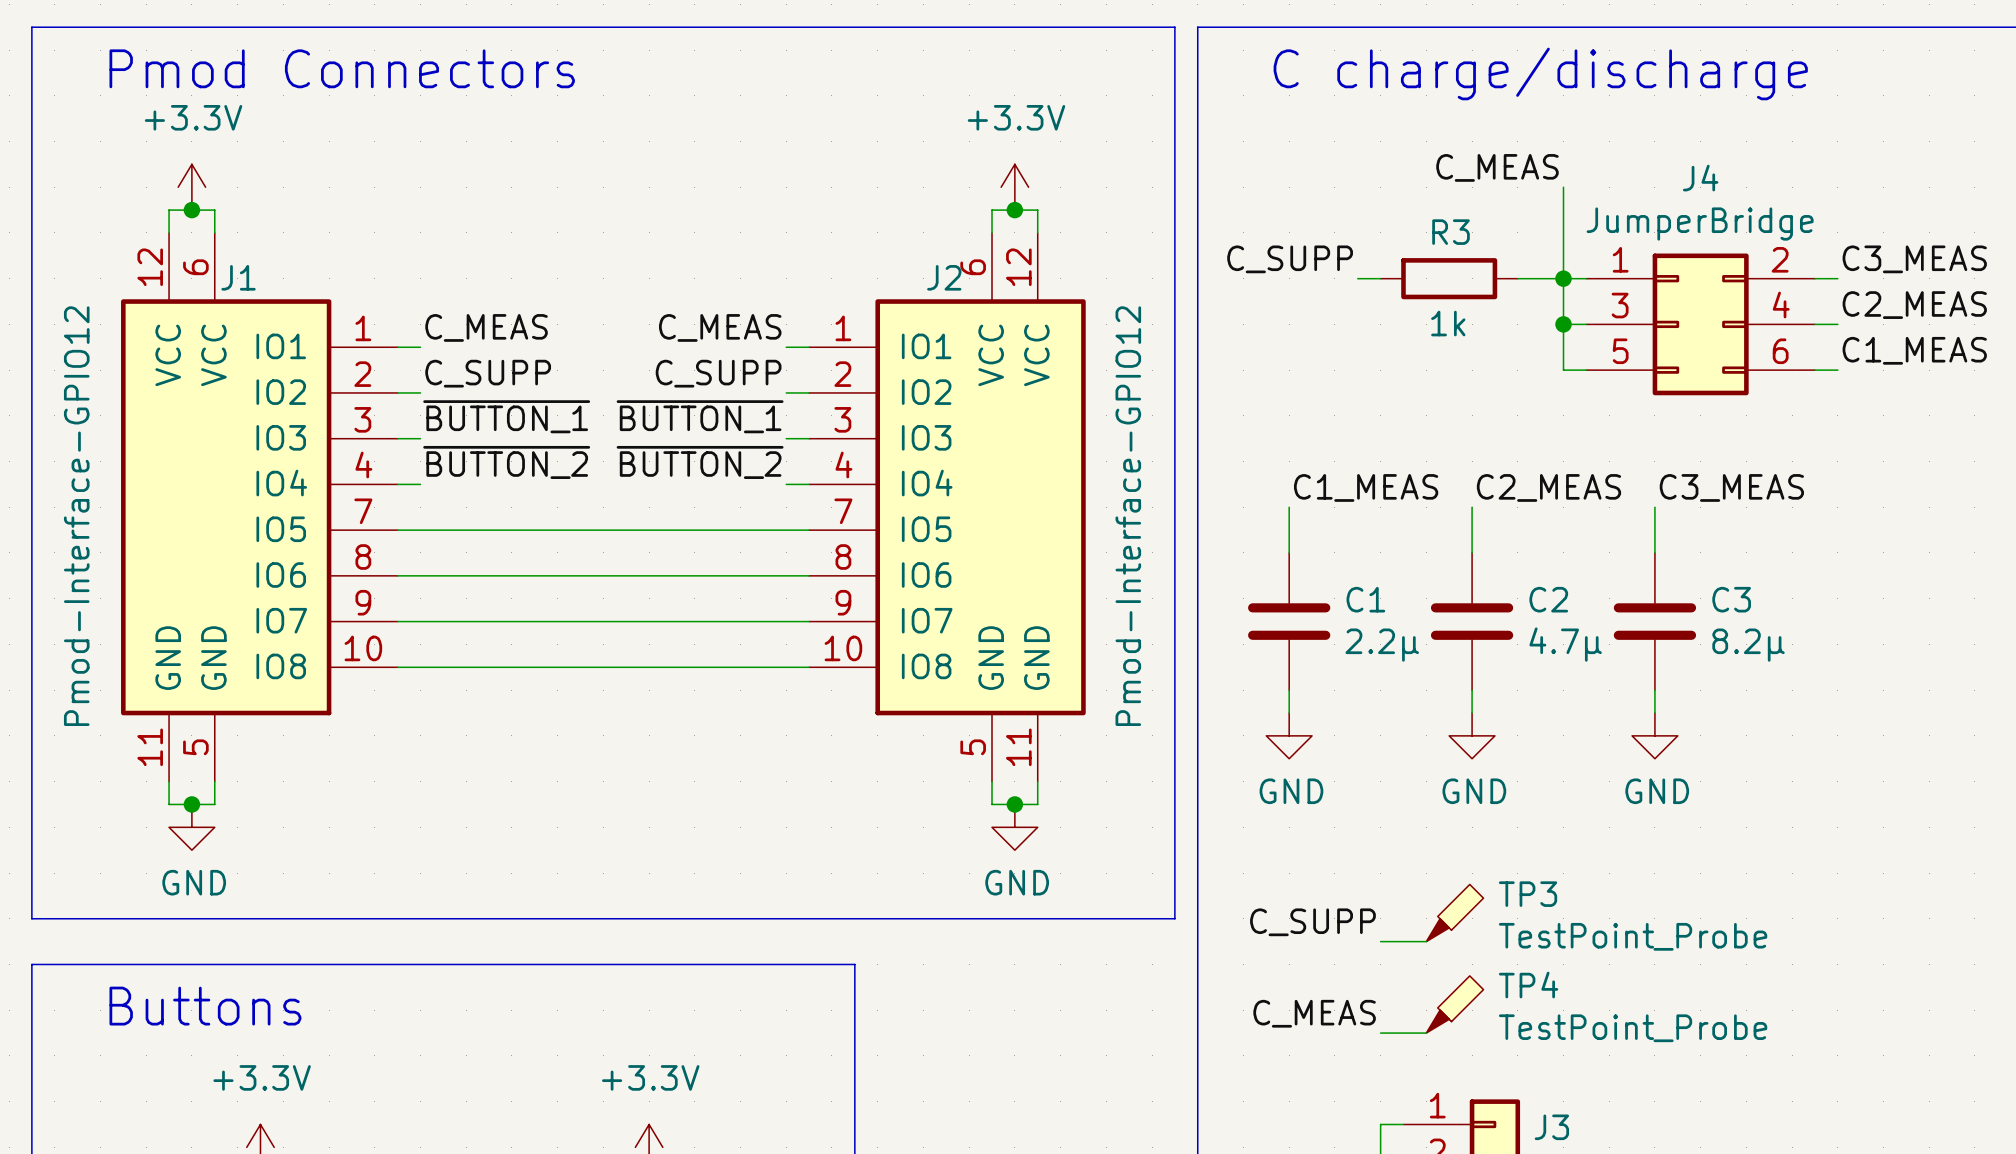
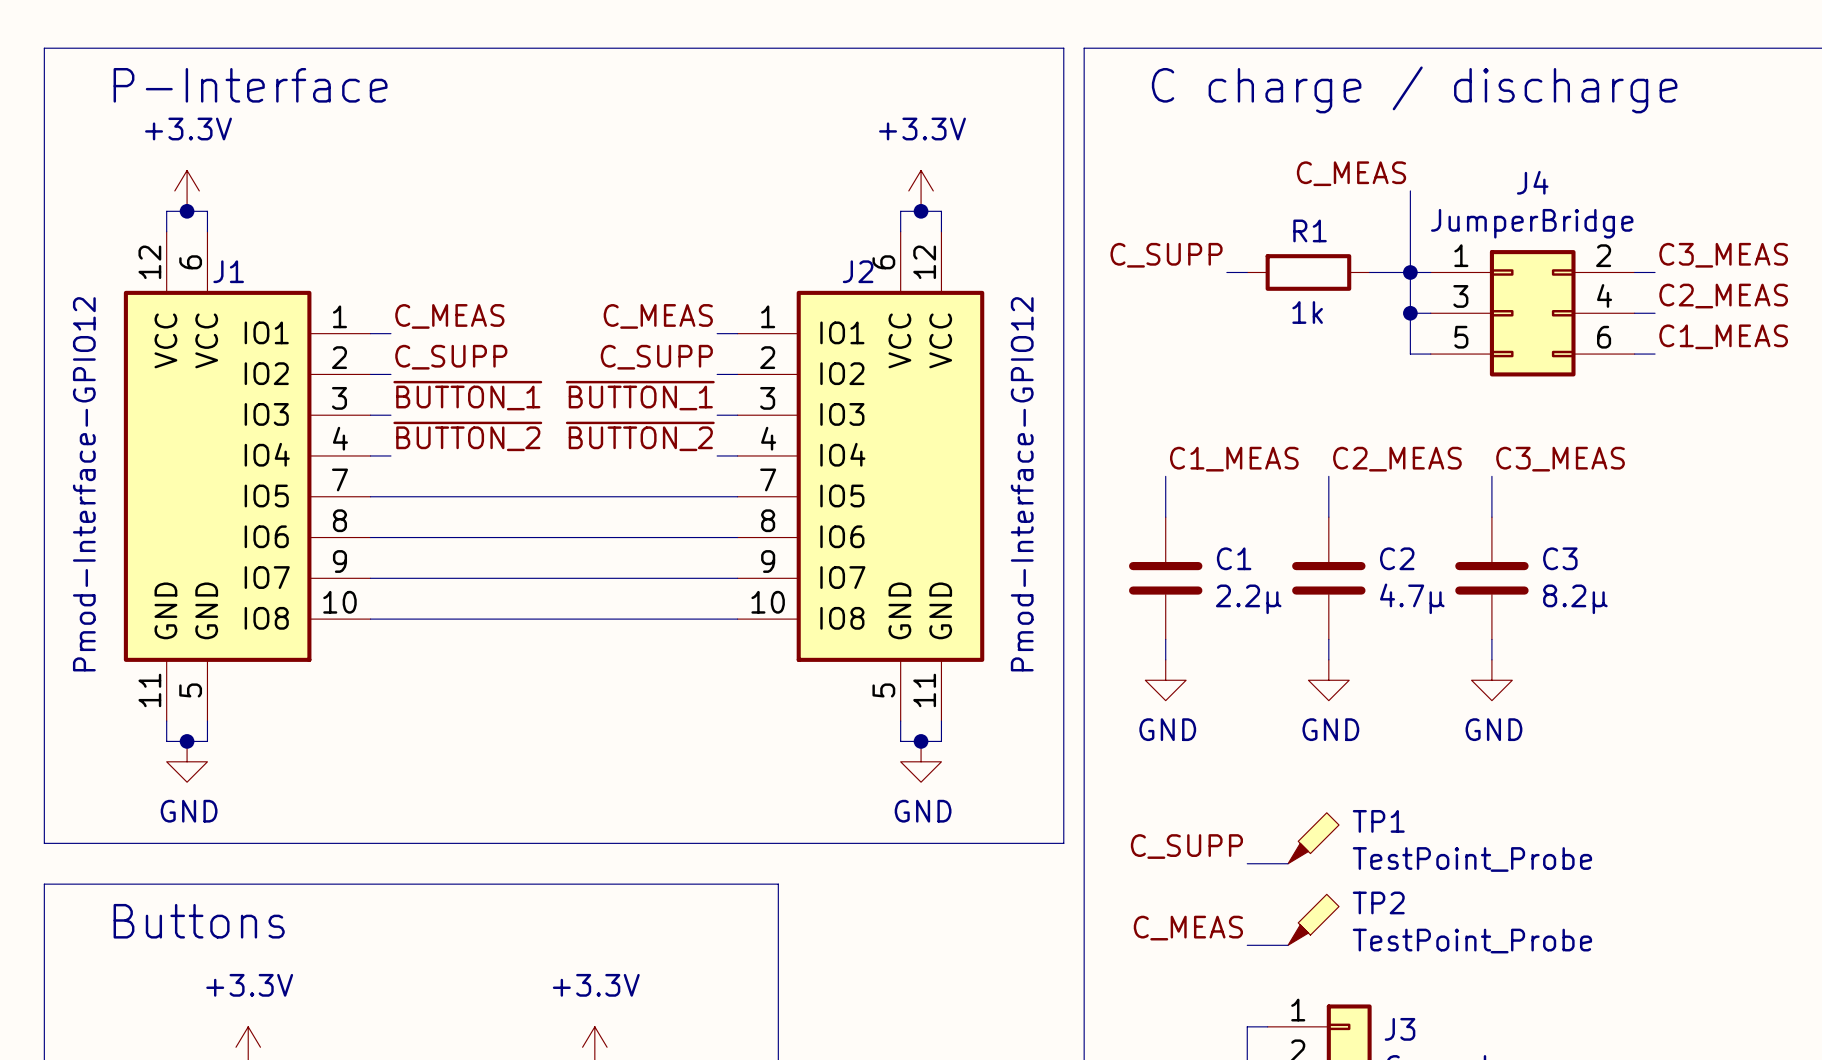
text: Pmod Connectors (342, 68) -> P-Interface (250, 85)
text: C charge/discharge (1540, 73) -> C charge / discharge (1414, 89)
R3 name: R3 (1451, 232) -> R1 (1310, 230)
TP3 name: TP3 (1528, 894) -> TP1 (1378, 821)
TP4 name: TP4 (1528, 985) -> TP2 (1378, 902)

